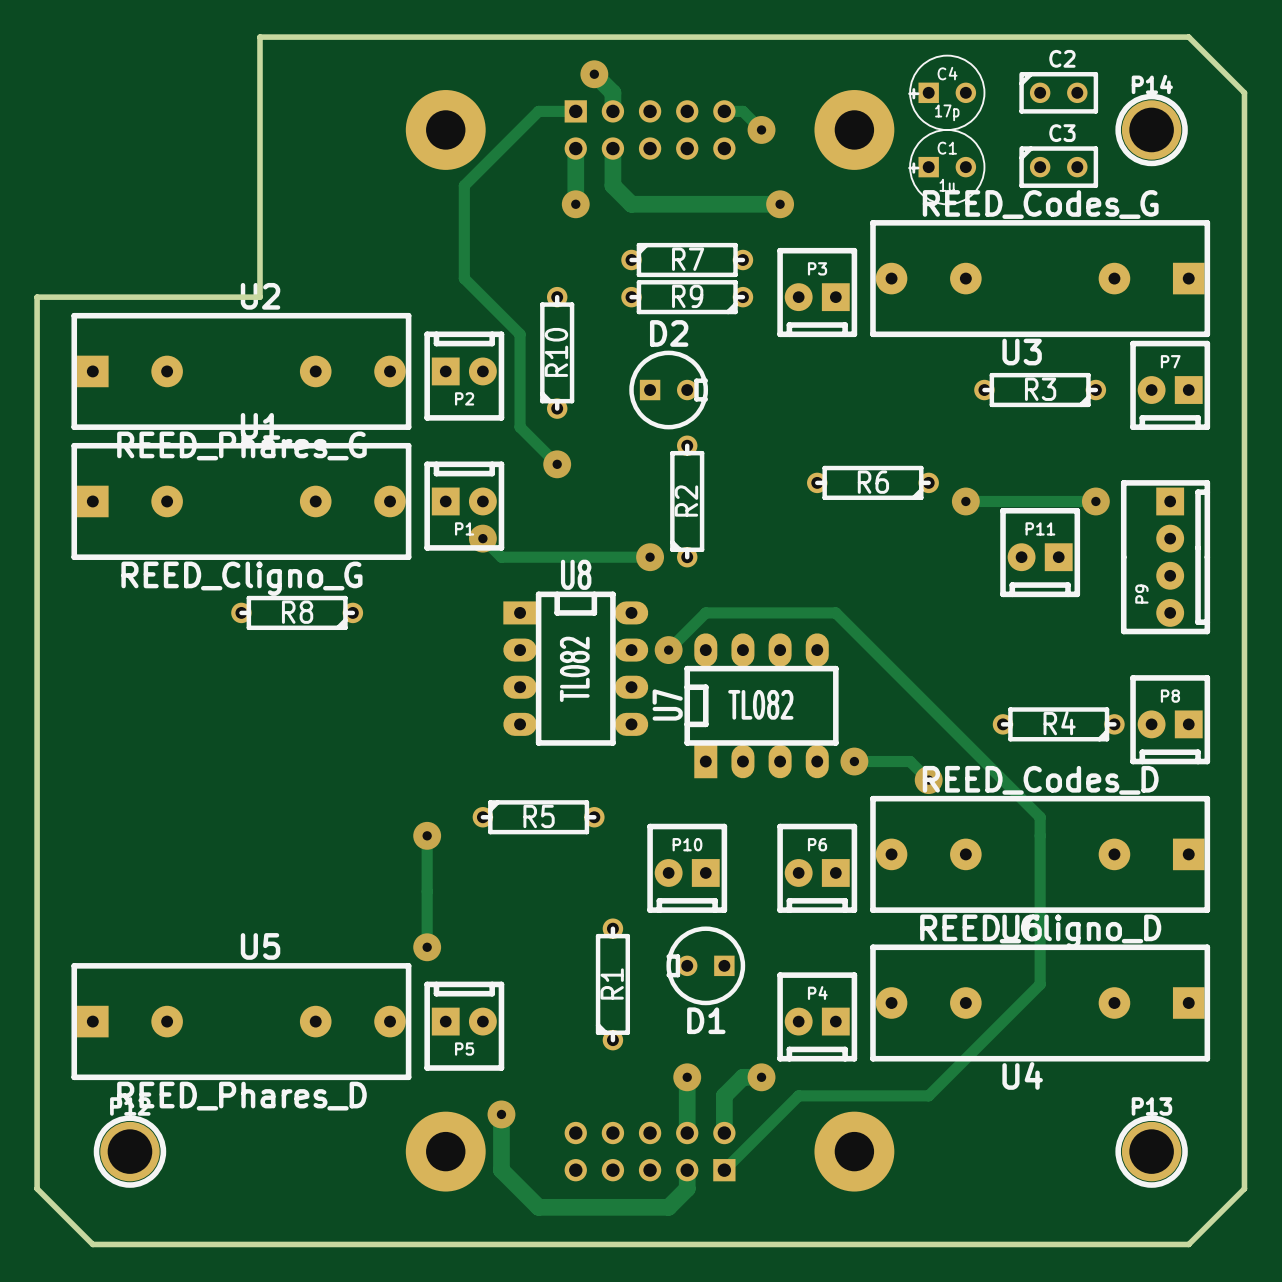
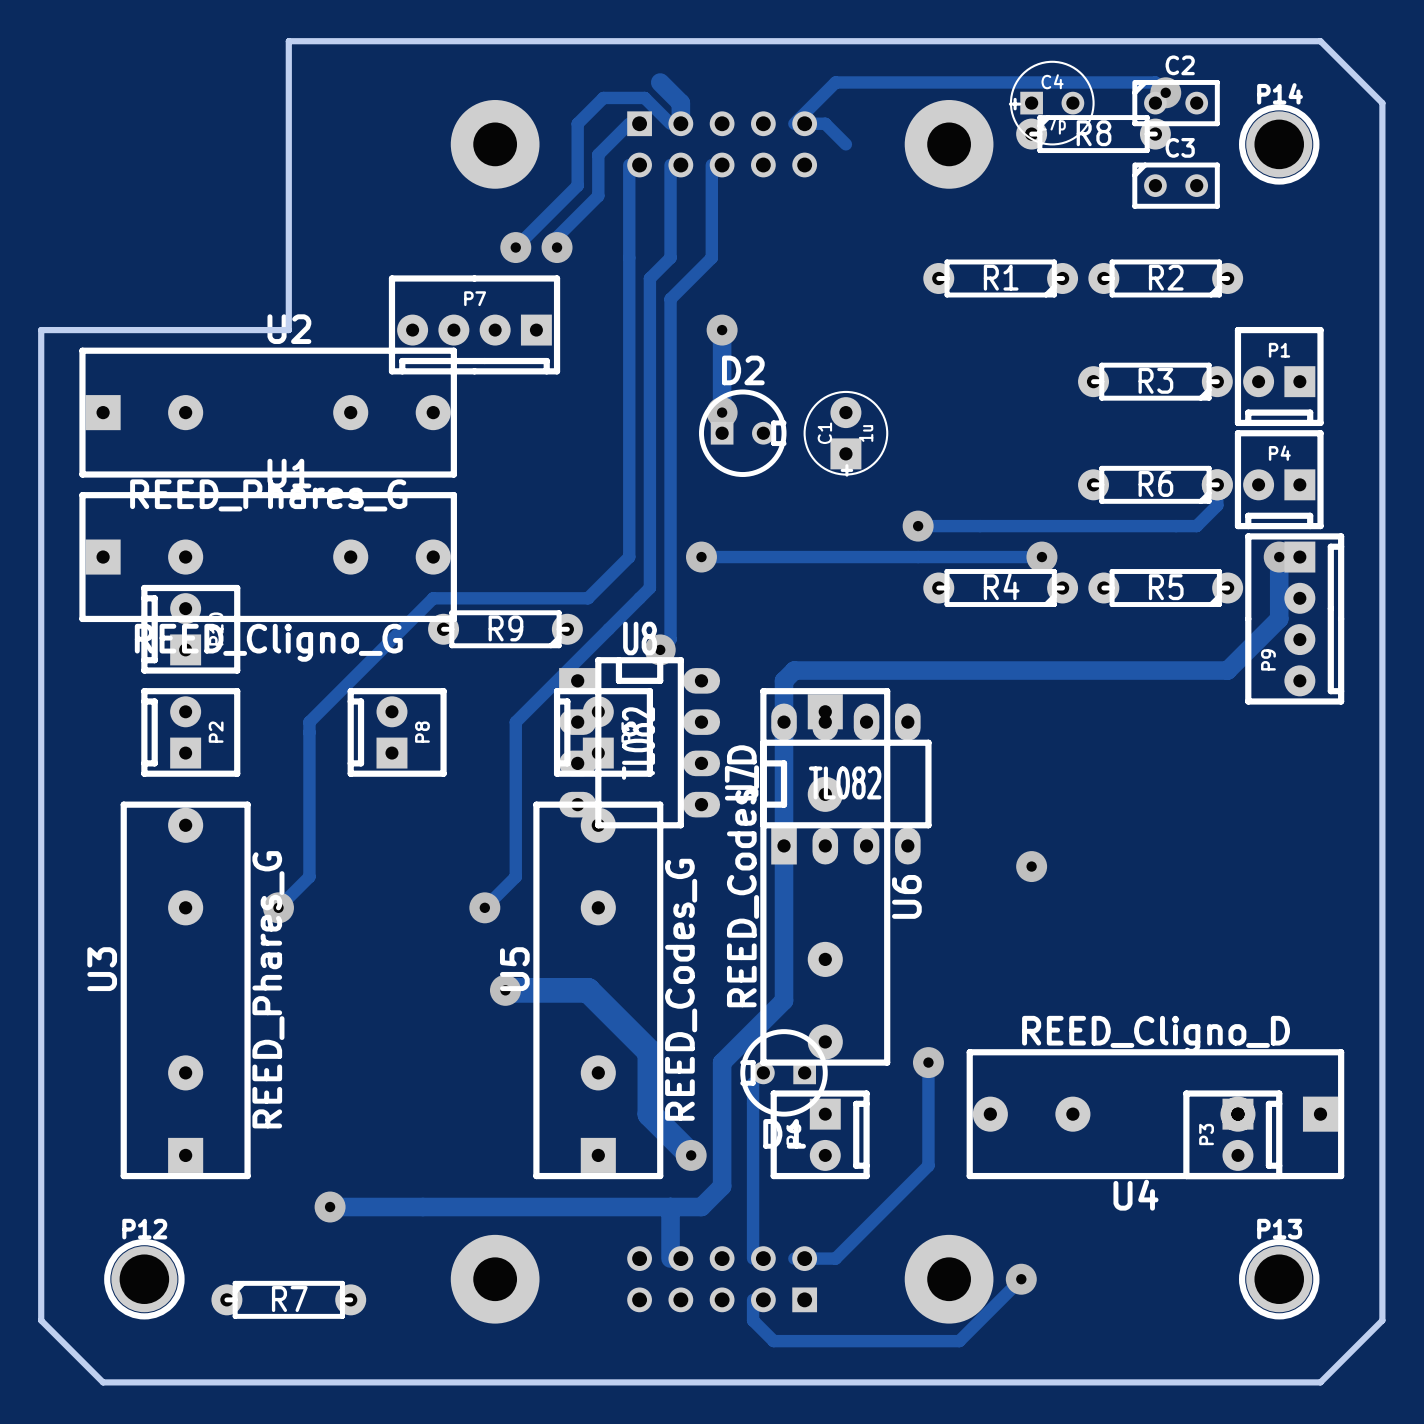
via: (594, 74) -> none
track: none -> (1165, 92) (1155, 82) (835, 82) (794, 123)
via: none -> (1165, 92)
track: none -> (629, 123) (598, 154) (598, 195) (557, 237) (557, 247)
track: (575, 111) (538, 111) (464, 185) (464, 278) (520, 334) (520, 427) (557, 464) -> none
track: none -> (670, 123) (644, 97) (603, 97) (577, 123) (577, 185) (515, 247)
C1 footprint: [909, 128, 986, 206] -> [803, 390, 889, 476]
via: (761, 129) -> none
track: none -> (629, 165) (629, 557) (588, 598) (433, 598) (309, 722) (309, 876) (278, 907)
track: (575, 148) (575, 204) -> none
track: none -> (670, 165) (670, 257) (649, 278) (649, 588) (515, 722) (515, 876) (484, 907)
track: (612, 148) (612, 185) (631, 204) (780, 204) -> none
track: none -> (711, 165) (711, 257) (670, 299) (670, 639) (660, 649)
via: (575, 204) -> none
via: (780, 204) -> none
U3 value: REED_Codes_G (1040, 204) -> REED_Phares_G (268, 989)
via: none -> (515, 247)
via: none -> (557, 247)
R7 footprint: [621, 242, 754, 278] -> [211, 1280, 367, 1319]
U3 rotation: 0° (1040, 278) -> 90° clockwise (185, 990)
U3 position: (1040, 278) -> (185, 990)
R9 footprint: [621, 280, 754, 315] -> [428, 610, 583, 649]
P3 rotation: 0° (817, 292) -> 90° counterclockwise (1232, 1134)
P3 position: (817, 292) -> (1232, 1134)
track: none -> (722, 330) (722, 412)
via: none -> (722, 330)
P7 footprint: [1130, 340, 1211, 430] -> [388, 275, 561, 375]
R10: (557, 352) -> none
via: none -> (722, 412)
R3 footprint: [974, 372, 1107, 408] -> [1078, 362, 1233, 401]
P2 rotation: 0° (464, 376) -> 90° counterclockwise (190, 732)
P2 position: (464, 376) -> (190, 732)
R2 footprint: [670, 435, 705, 568] -> [1088, 259, 1244, 298]
track: none -> (1217, 484) (1217, 505) (1196, 526) (918, 526)
via: (557, 464) -> none
R6 footprint: [807, 465, 939, 500] -> [1078, 465, 1233, 504]
via: none -> (918, 526)
track: none -> (701, 557) (1041, 557)
via: none -> (701, 557)
track: (965, 501) (1095, 501) -> none
via position: (965, 501) -> (1041, 557)
via: (1095, 501) -> none
track: none -> (1279, 557) (1279, 618) (1227, 670) (794, 670) (784, 680) (784, 1000) (722, 1062) (722, 1186) (701, 1207) (330, 1207)
via: none -> (1279, 557)
P1 rotation: 0° (464, 506) -> 180° (1279, 376)
P1 position: (464, 506) -> (1279, 376)
track: (482, 538) (501, 557) (650, 557) -> none
via: (482, 538) -> none
P11: (1040, 552) -> none
via: (650, 557) -> none
via: none -> (660, 649)
R8 footprint: [231, 595, 364, 631] -> [1016, 115, 1171, 154]
track: (668, 650) (705, 612) (835, 612) (1040, 817) (1040, 984) (928, 1095) (798, 1095) (724, 1170) -> none
via: (668, 650) -> none
R4 footprint: [992, 707, 1125, 742] -> [923, 569, 1079, 607]
P8 rotation: 0° (1170, 719) -> 90° clockwise (397, 732)
P8 position: (1170, 719) -> (397, 732)
track: (854, 761) (910, 761) (928, 780) -> none
via: (854, 761) -> none
R5 footprint: [472, 800, 605, 835] -> [1088, 569, 1244, 607]
via: none -> (278, 907)
track: (427, 835) (427, 947) -> none
via position: (427, 835) -> (484, 907)
U6 rotation: 0° (1040, 854) -> 90° counterclockwise (825, 876)
U6 position: (1040, 854) -> (825, 876)
P10 rotation: 0° (687, 868) -> 90° clockwise (190, 629)
P10 position: (687, 868) -> (190, 629)
P6 rotation: 0° (817, 868) -> 90° counterclockwise (820, 1134)
P6 position: (817, 868) -> (820, 1134)
track: none -> (505, 990) (588, 990) (649, 1052) (649, 1114) (691, 1155)
via: none -> (505, 990)
R1 footprint: [595, 918, 631, 1051] -> [923, 259, 1079, 298]
via: (427, 947) -> none
track: none -> (928, 1062) (928, 1165) (835, 1258) (794, 1258)
via: none -> (928, 1062)
track: none -> (753, 1083) (753, 1258)
P4 position: (817, 1016) -> (1279, 479)
U5 rotation: 0° (241, 1021) -> 90° counterclockwise (598, 990)
U5 position: (241, 1021) -> (598, 990)
P5 rotation: 0° (464, 1026) -> 90° counterclockwise (603, 732)
P5 position: (464, 1026) -> (603, 732)
via: none -> (691, 1155)
track: (687, 1077) (687, 1133) -> none
via: (687, 1077) -> none
track: (761, 1077) (742, 1077) (724, 1095) (724, 1133) -> none
via: (761, 1077) -> none
via: none -> (330, 1207)
track: none -> (670, 1207) (670, 1258)
U5 value: REED_Phares_D (241, 1096) -> REED_Codes_G (681, 989)
track: (501, 1114) (501, 1170) (538, 1207) (668, 1207) (687, 1188) (687, 1170) -> none
via: (501, 1114) -> none
track: none -> (1021, 1279) (959, 1341) (773, 1341) (753, 1320) (753, 1299)
via: none -> (1021, 1279)

